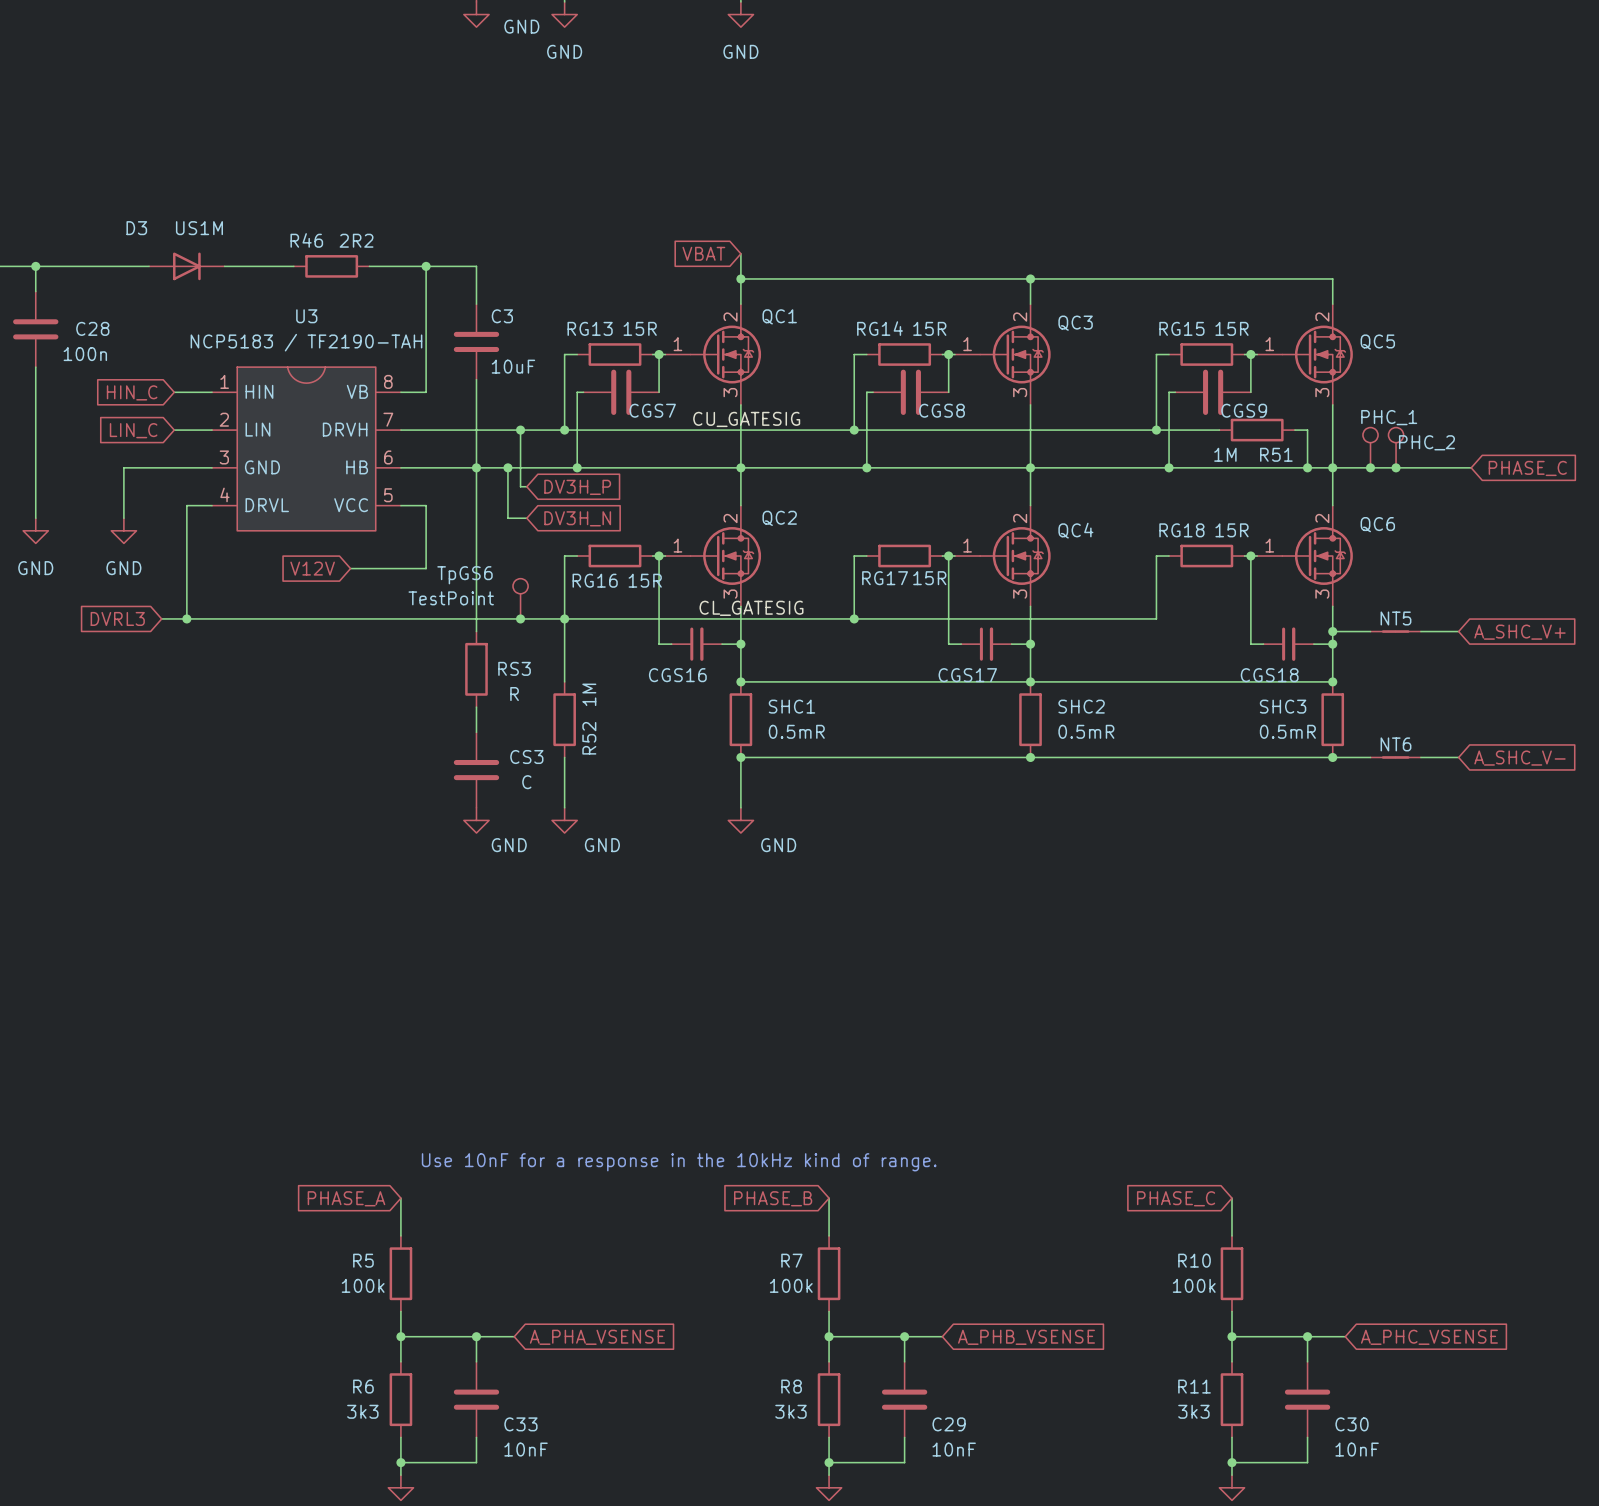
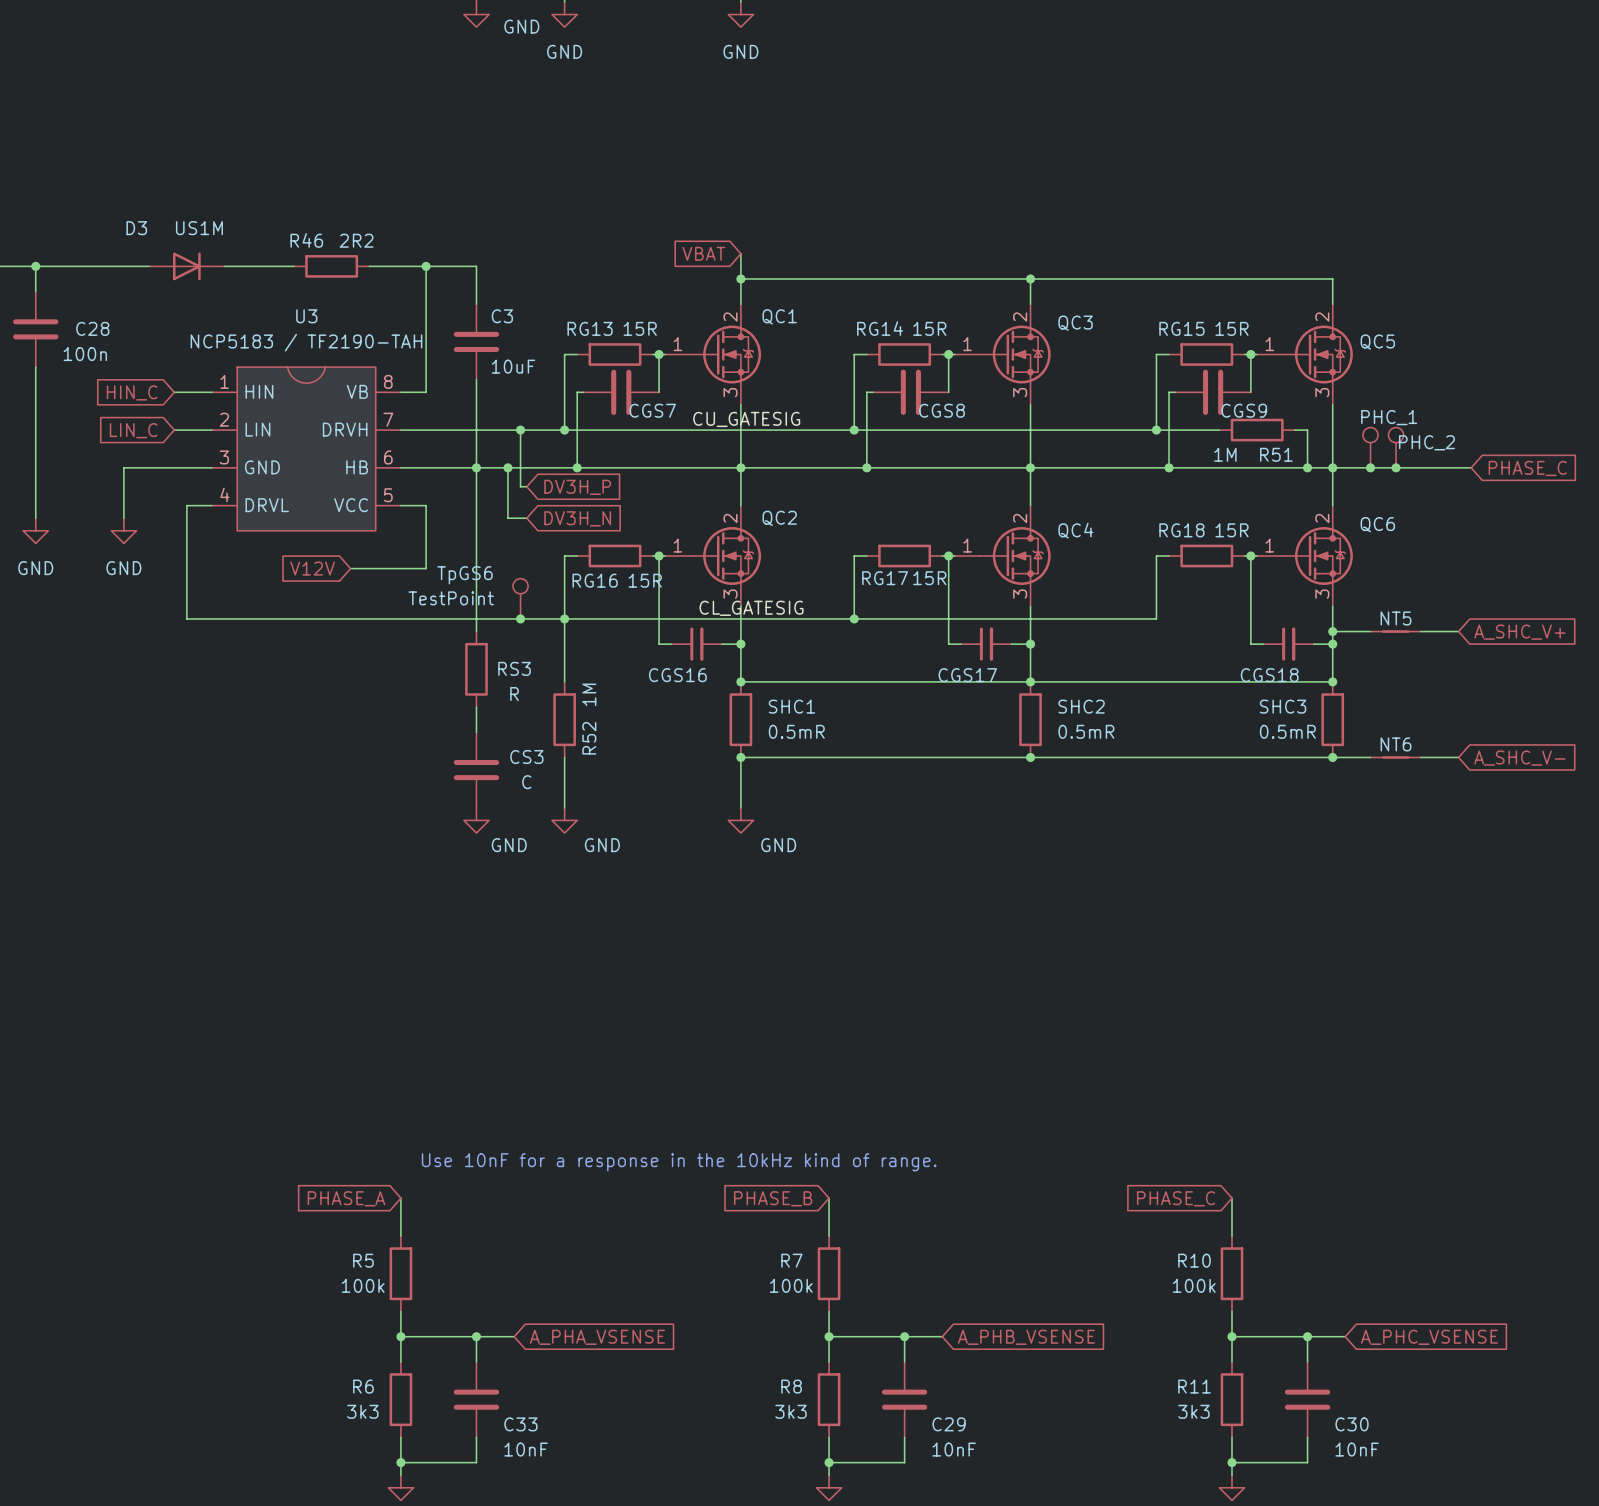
global label: DVRL3 (117, 618) -> none
wire: (161, 618) (186, 618) -> none
junction: (186, 618) -> none

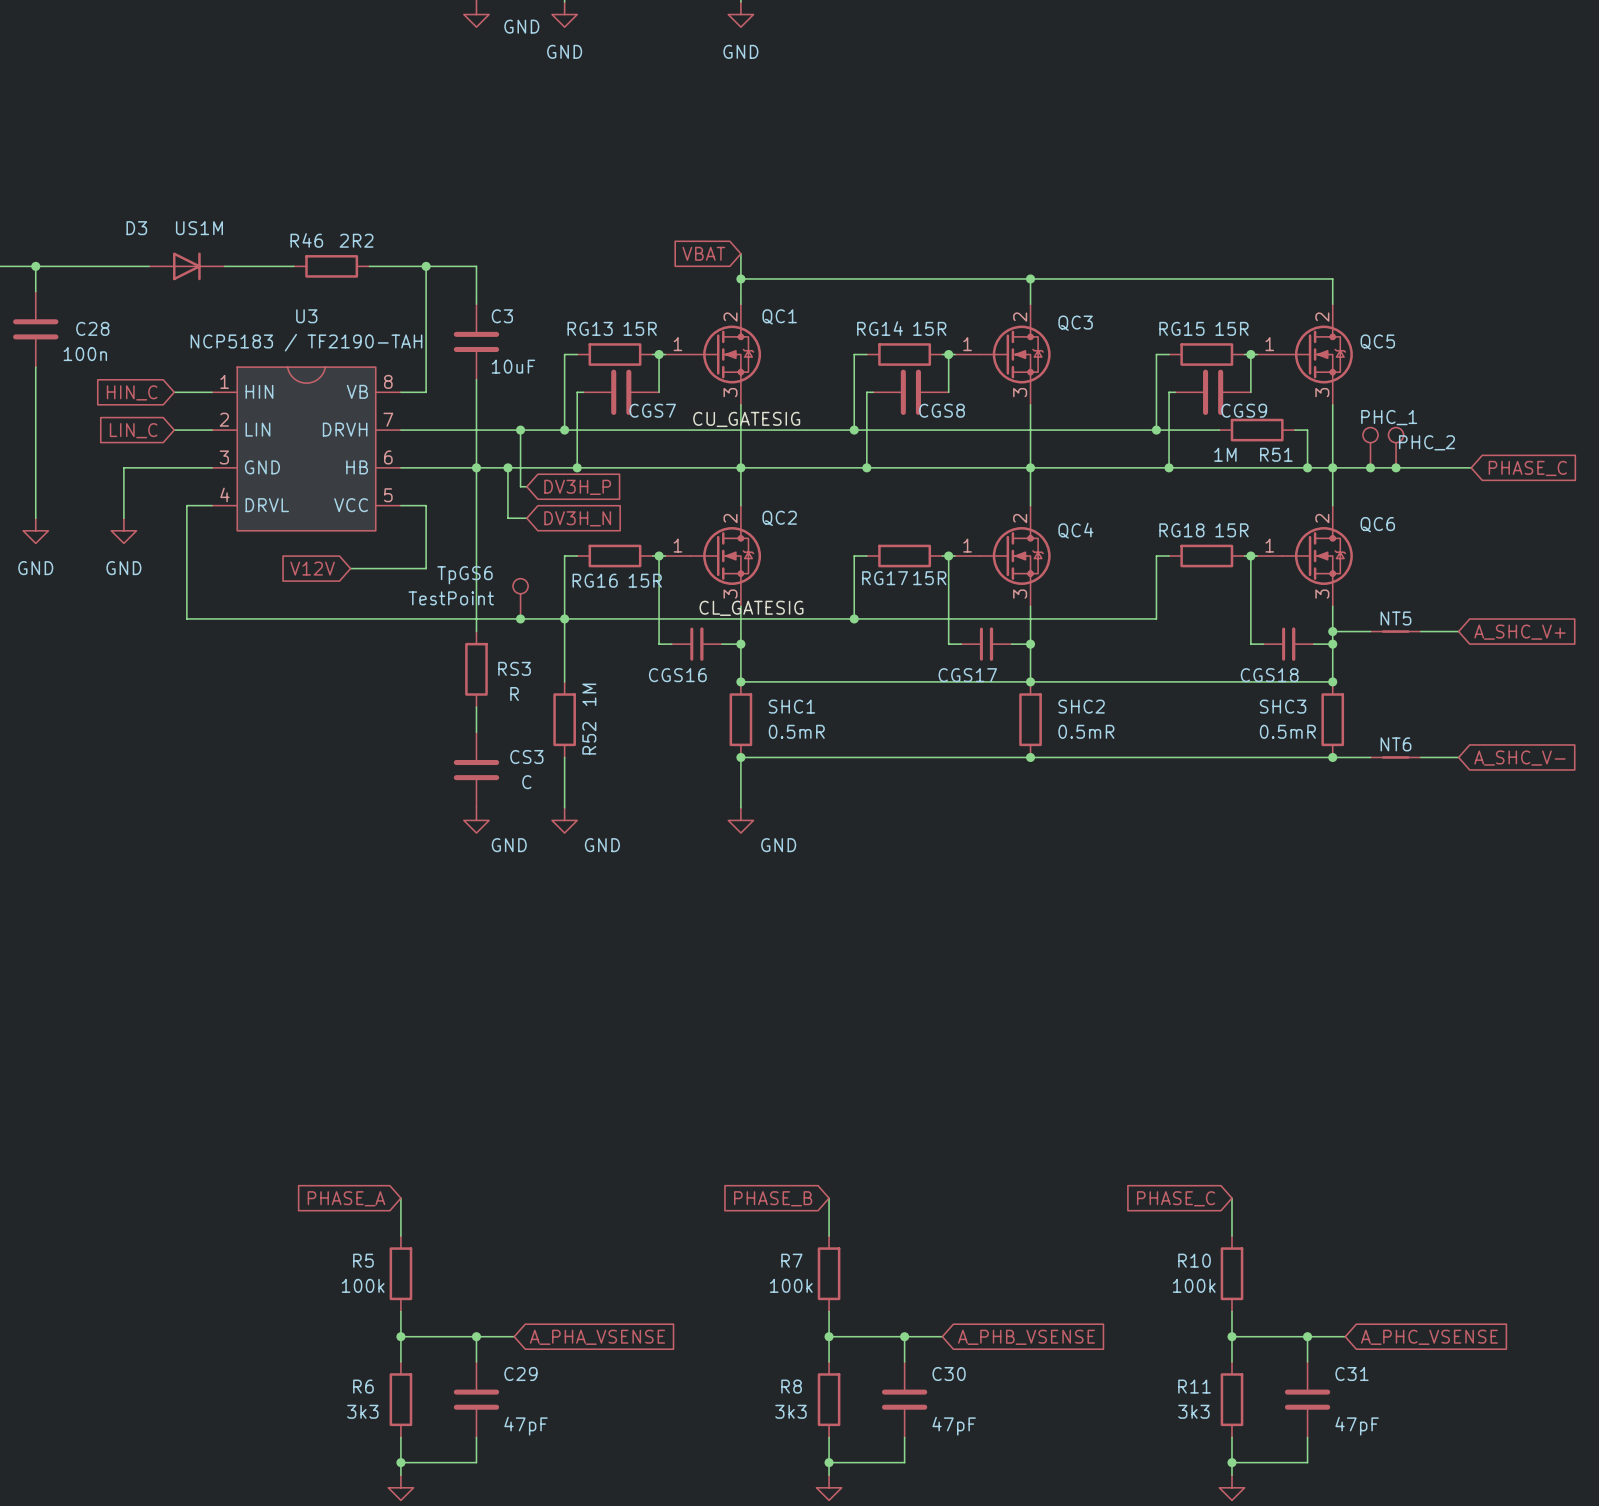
text: Use 10nF for a response in the 10kHz kind of range. (679, 1162) -> none
C33 name: C33 (520, 1424) -> C29 (520, 1374)
C29 name: C29 (949, 1424) -> C30 (949, 1374)
C30 name: C30 (1352, 1424) -> C31 (1352, 1374)
C33 value: 10nF (526, 1449) -> 47pF (526, 1426)
C29 value: 10nF (954, 1449) -> 47pF (954, 1426)
C30 value: 10nF (1357, 1449) -> 47pF (1357, 1426)

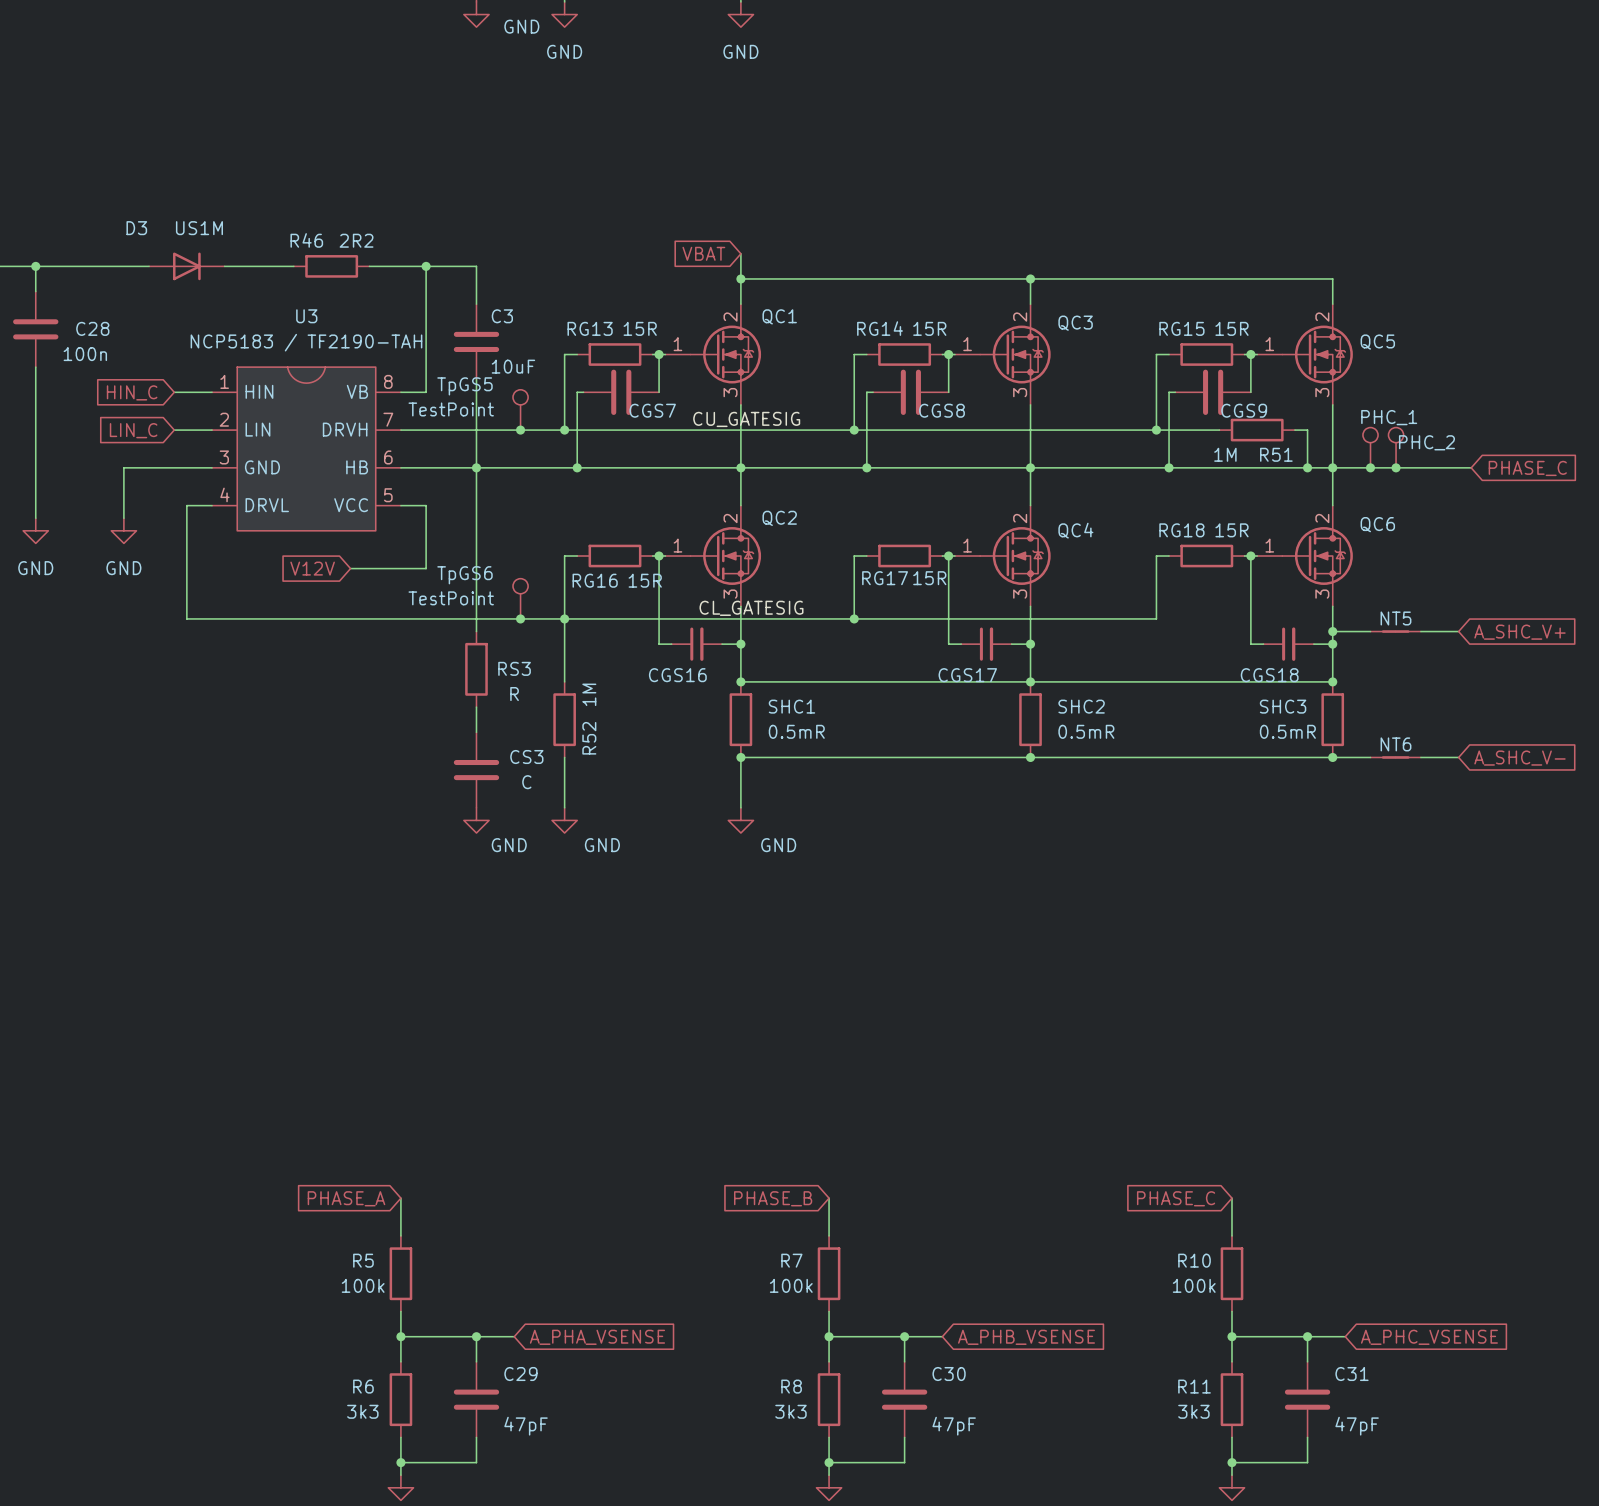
TpGS5: none -> TestPoint (520, 409)
wire: (520, 430) (520, 486) (526, 486) -> none
wire: (507, 467) (507, 518) (526, 518) -> none
junction: (507, 467) -> none
global label: DV3H_P (577, 487) -> none
global label: DV3H_N (577, 518) -> none

